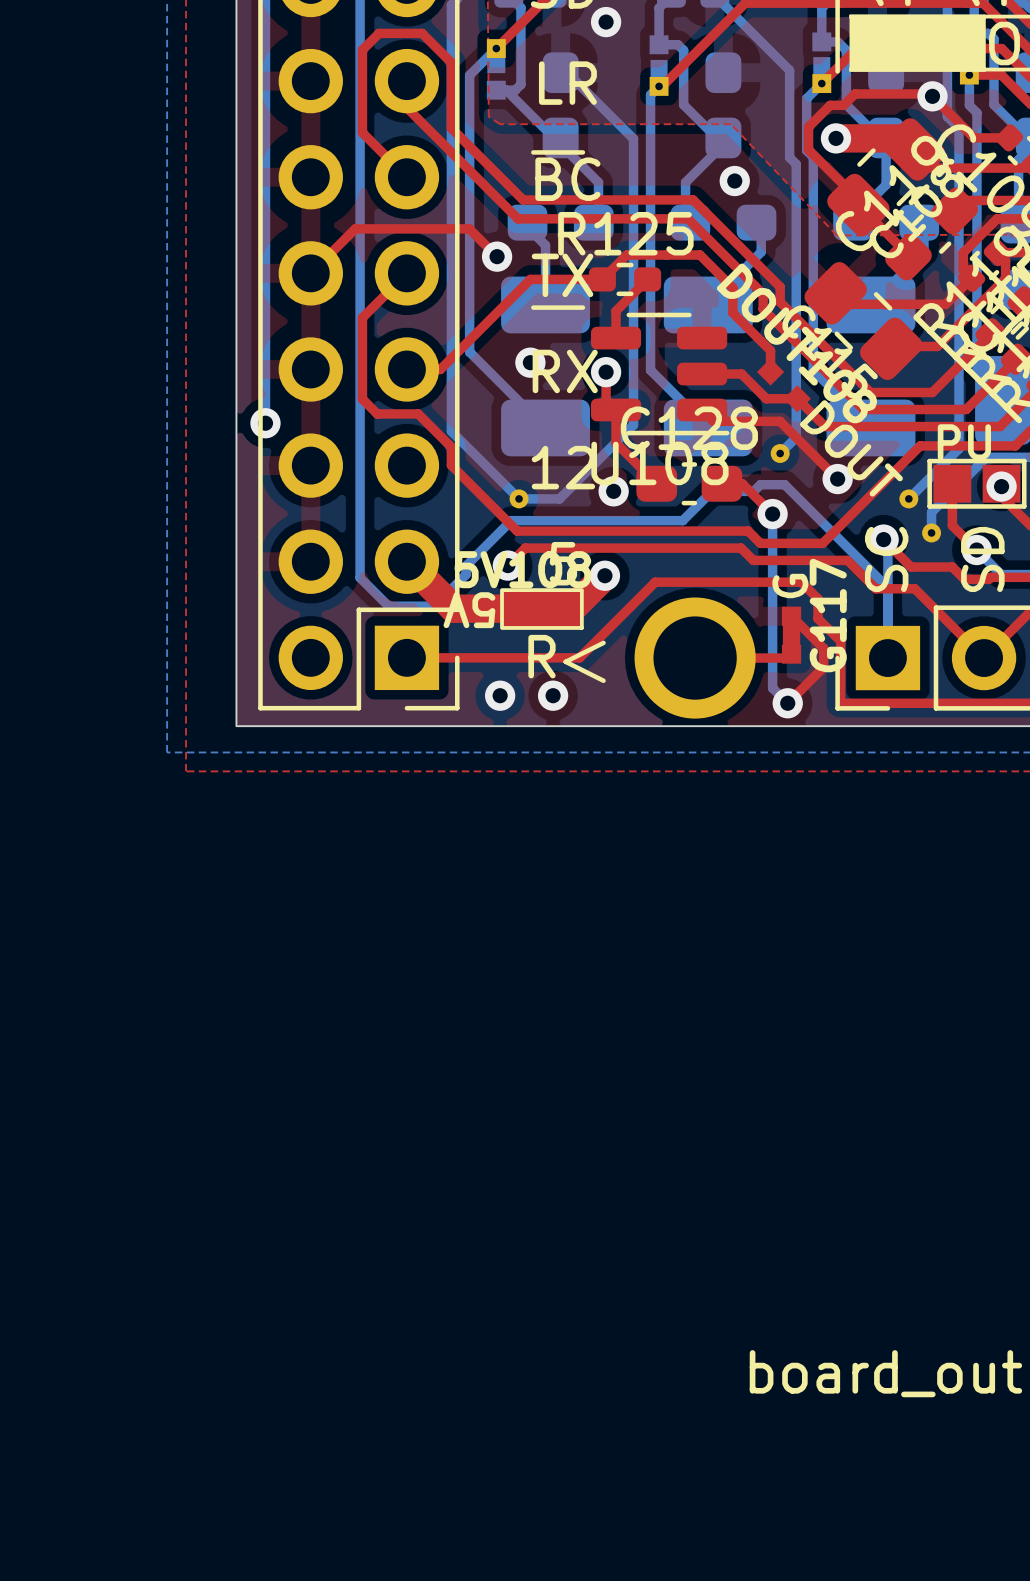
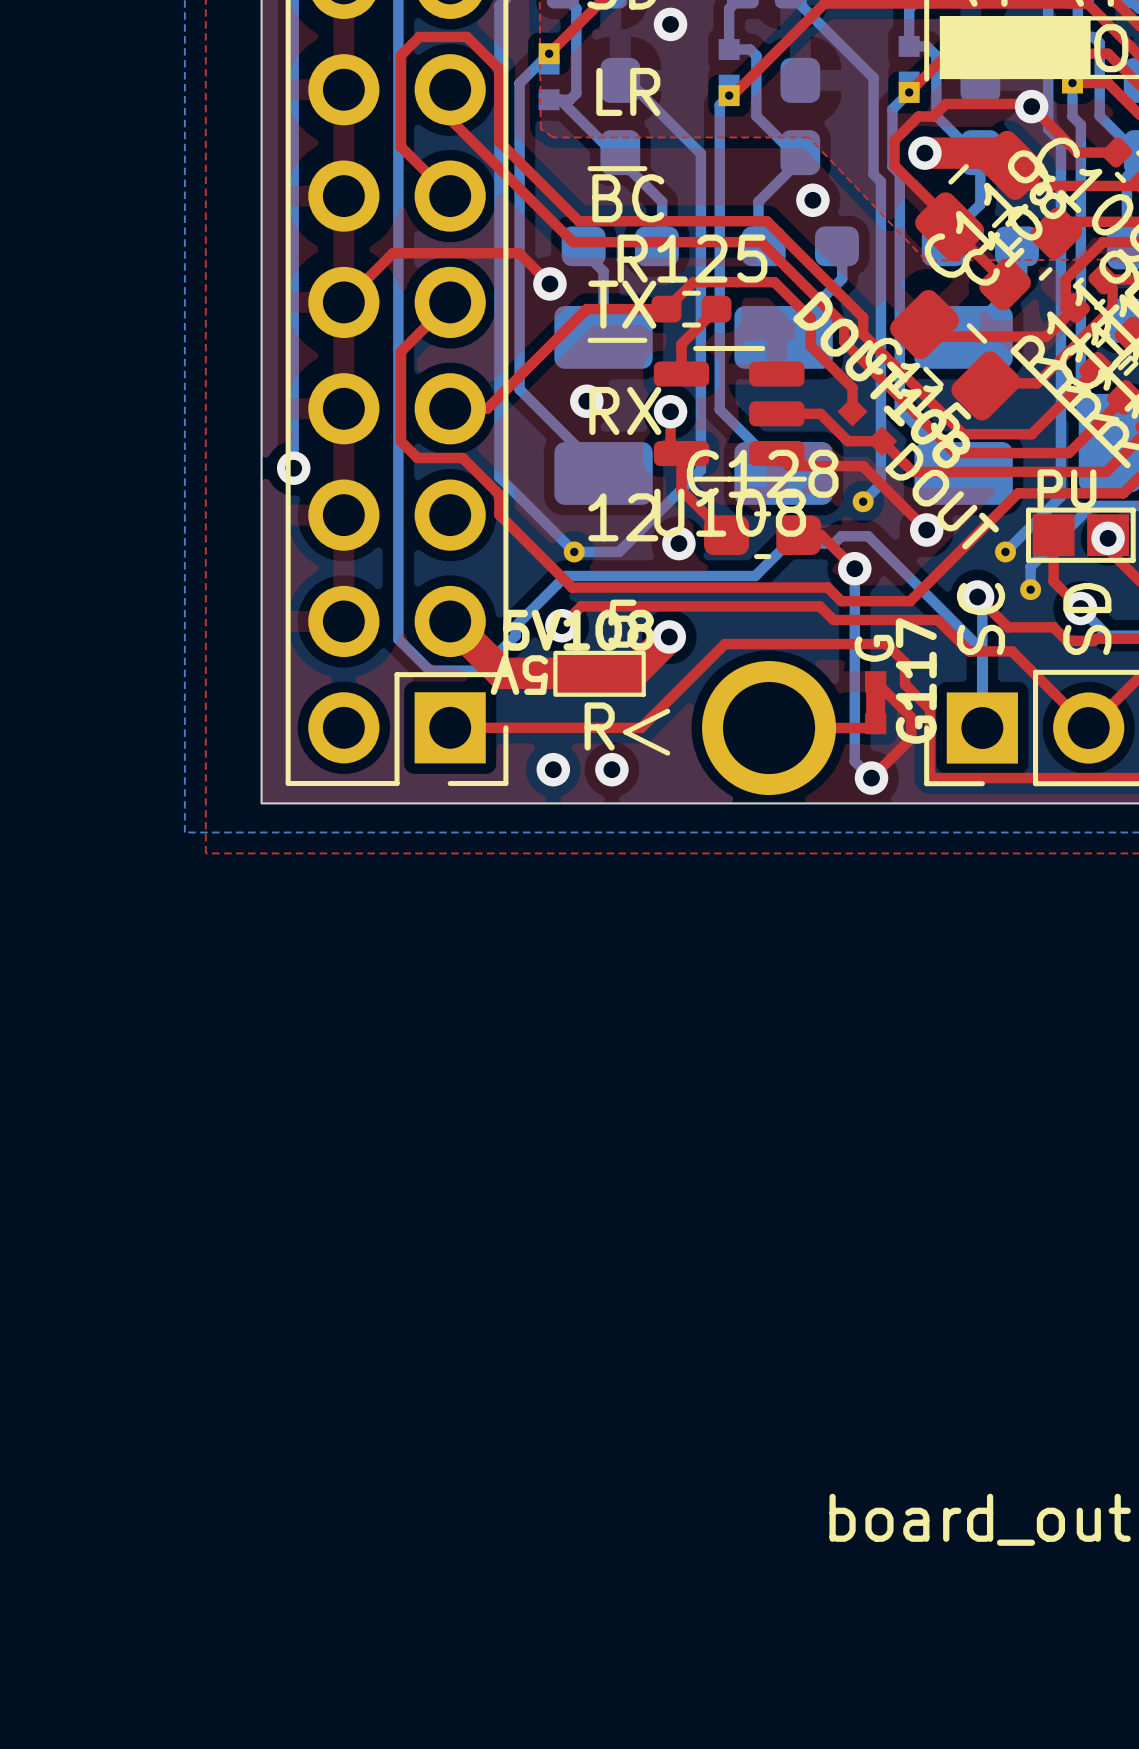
part footprint: [812, 32, 832, 94] -> [898, 35, 920, 103]
part footprint: [649, 35, 669, 96] -> [718, 39, 740, 107]
part footprint: [486, 39, 506, 100] -> [538, 43, 560, 111]

